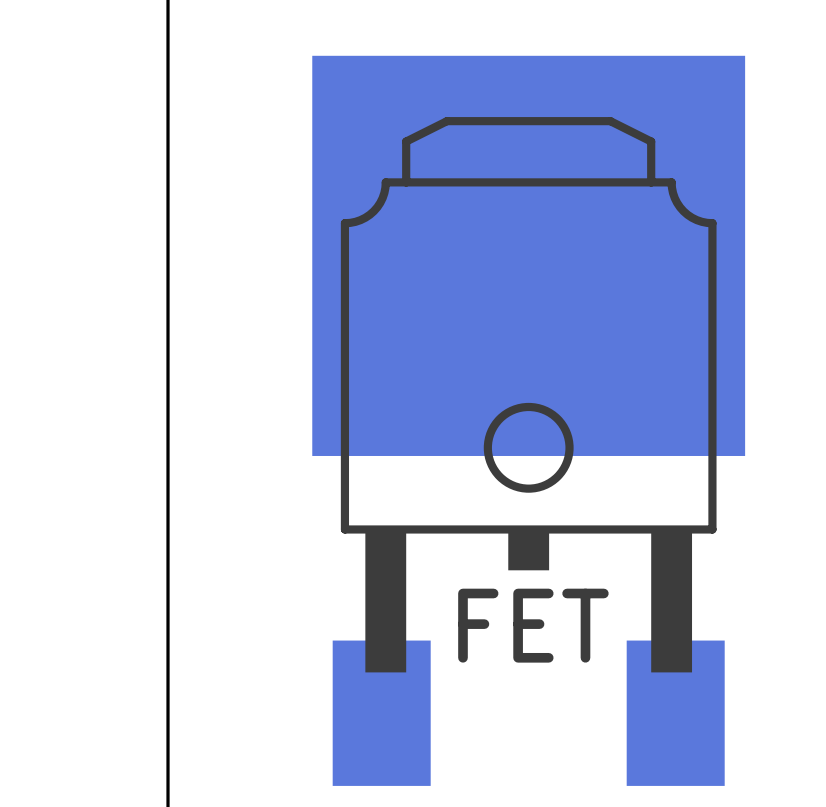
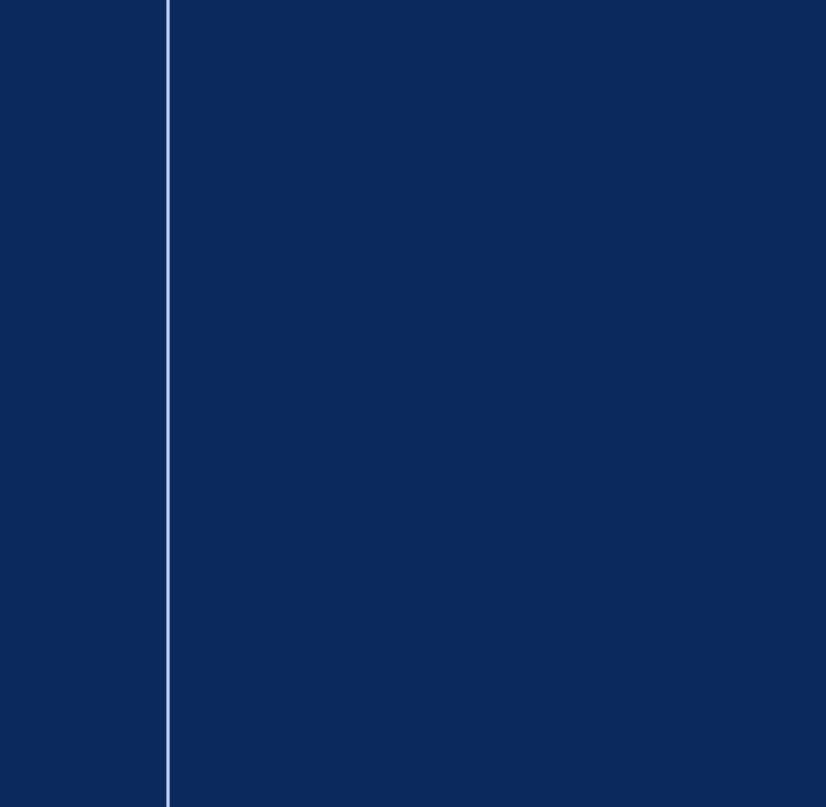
part: (528, 420) -> none
text: FET (533, 625) -> none

